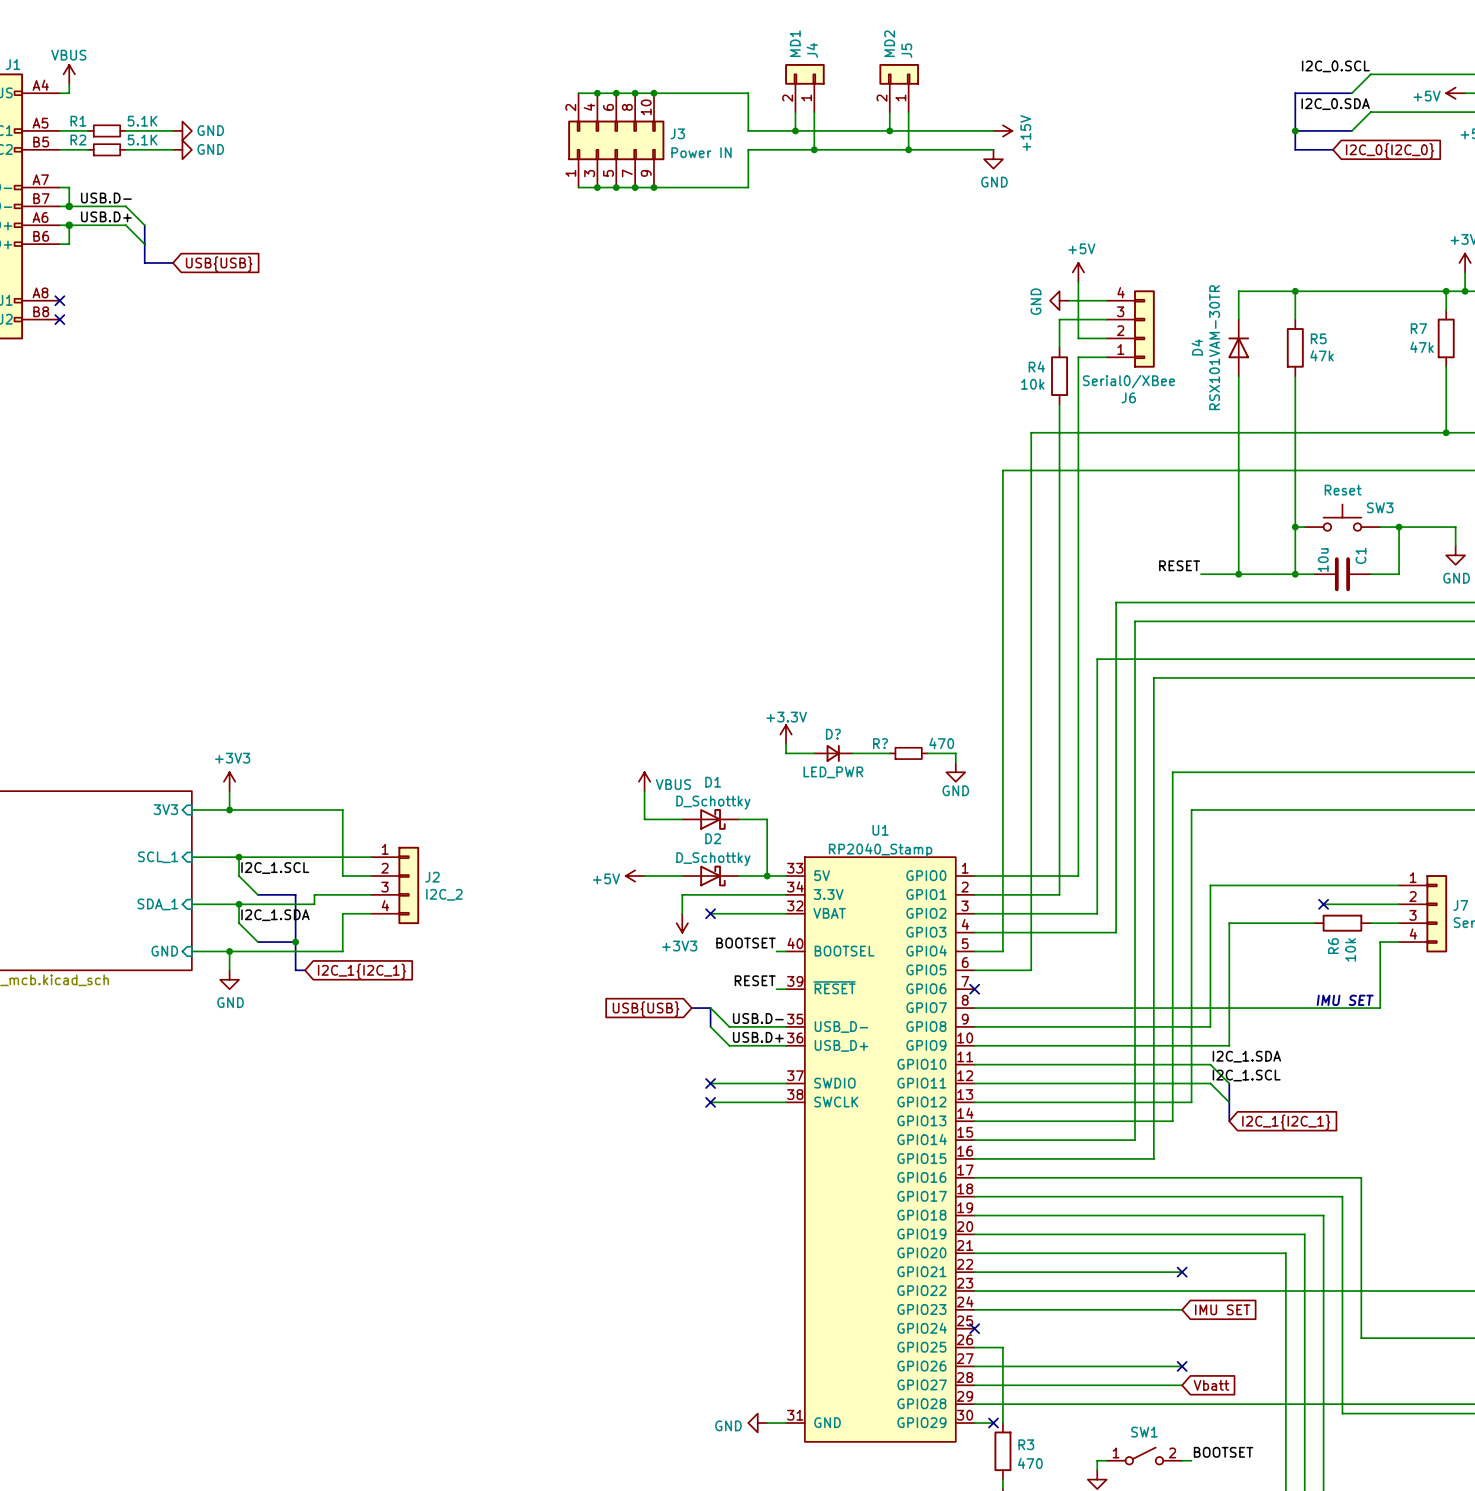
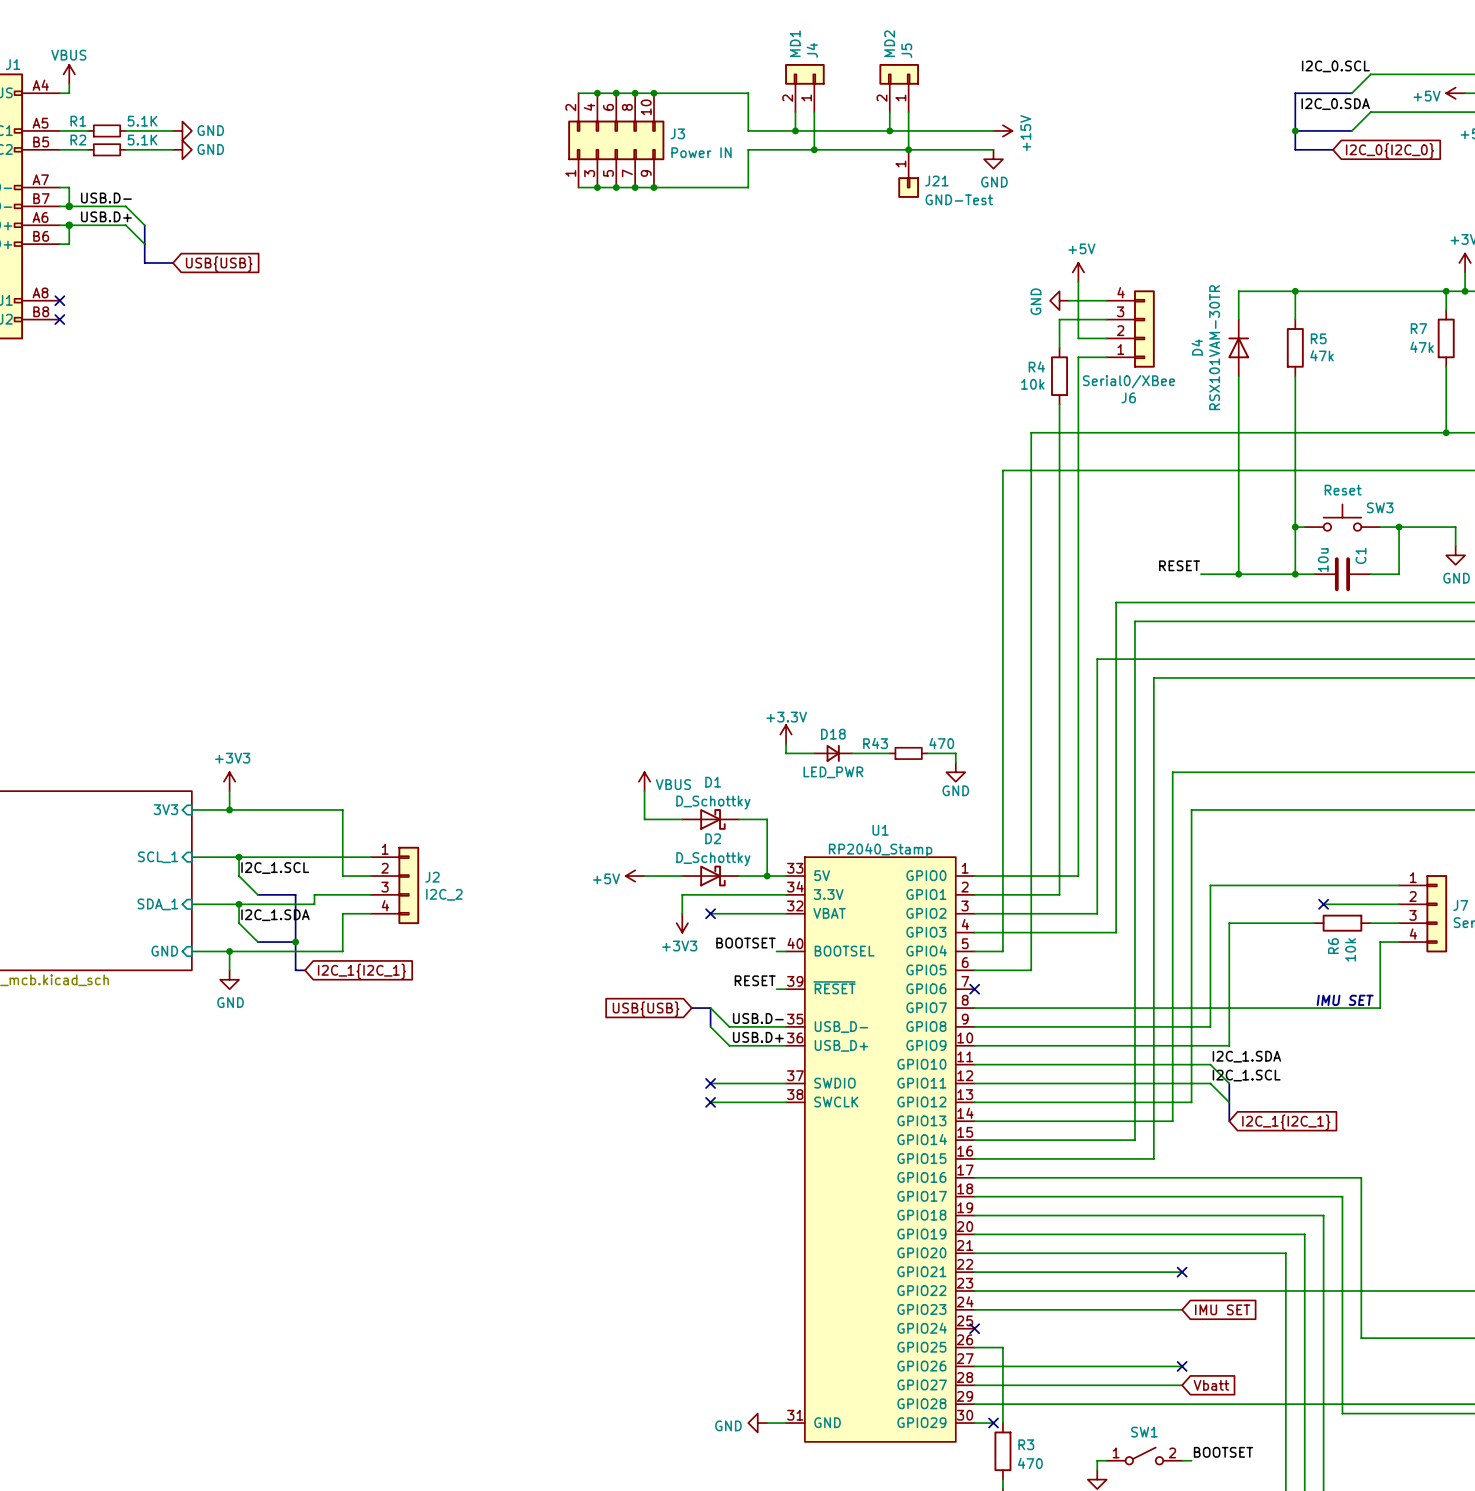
J21: none -> GND-Test (908, 173)
D? name: D? (833, 734) -> D18 (833, 734)
R? name: R? (880, 743) -> R43 (875, 743)

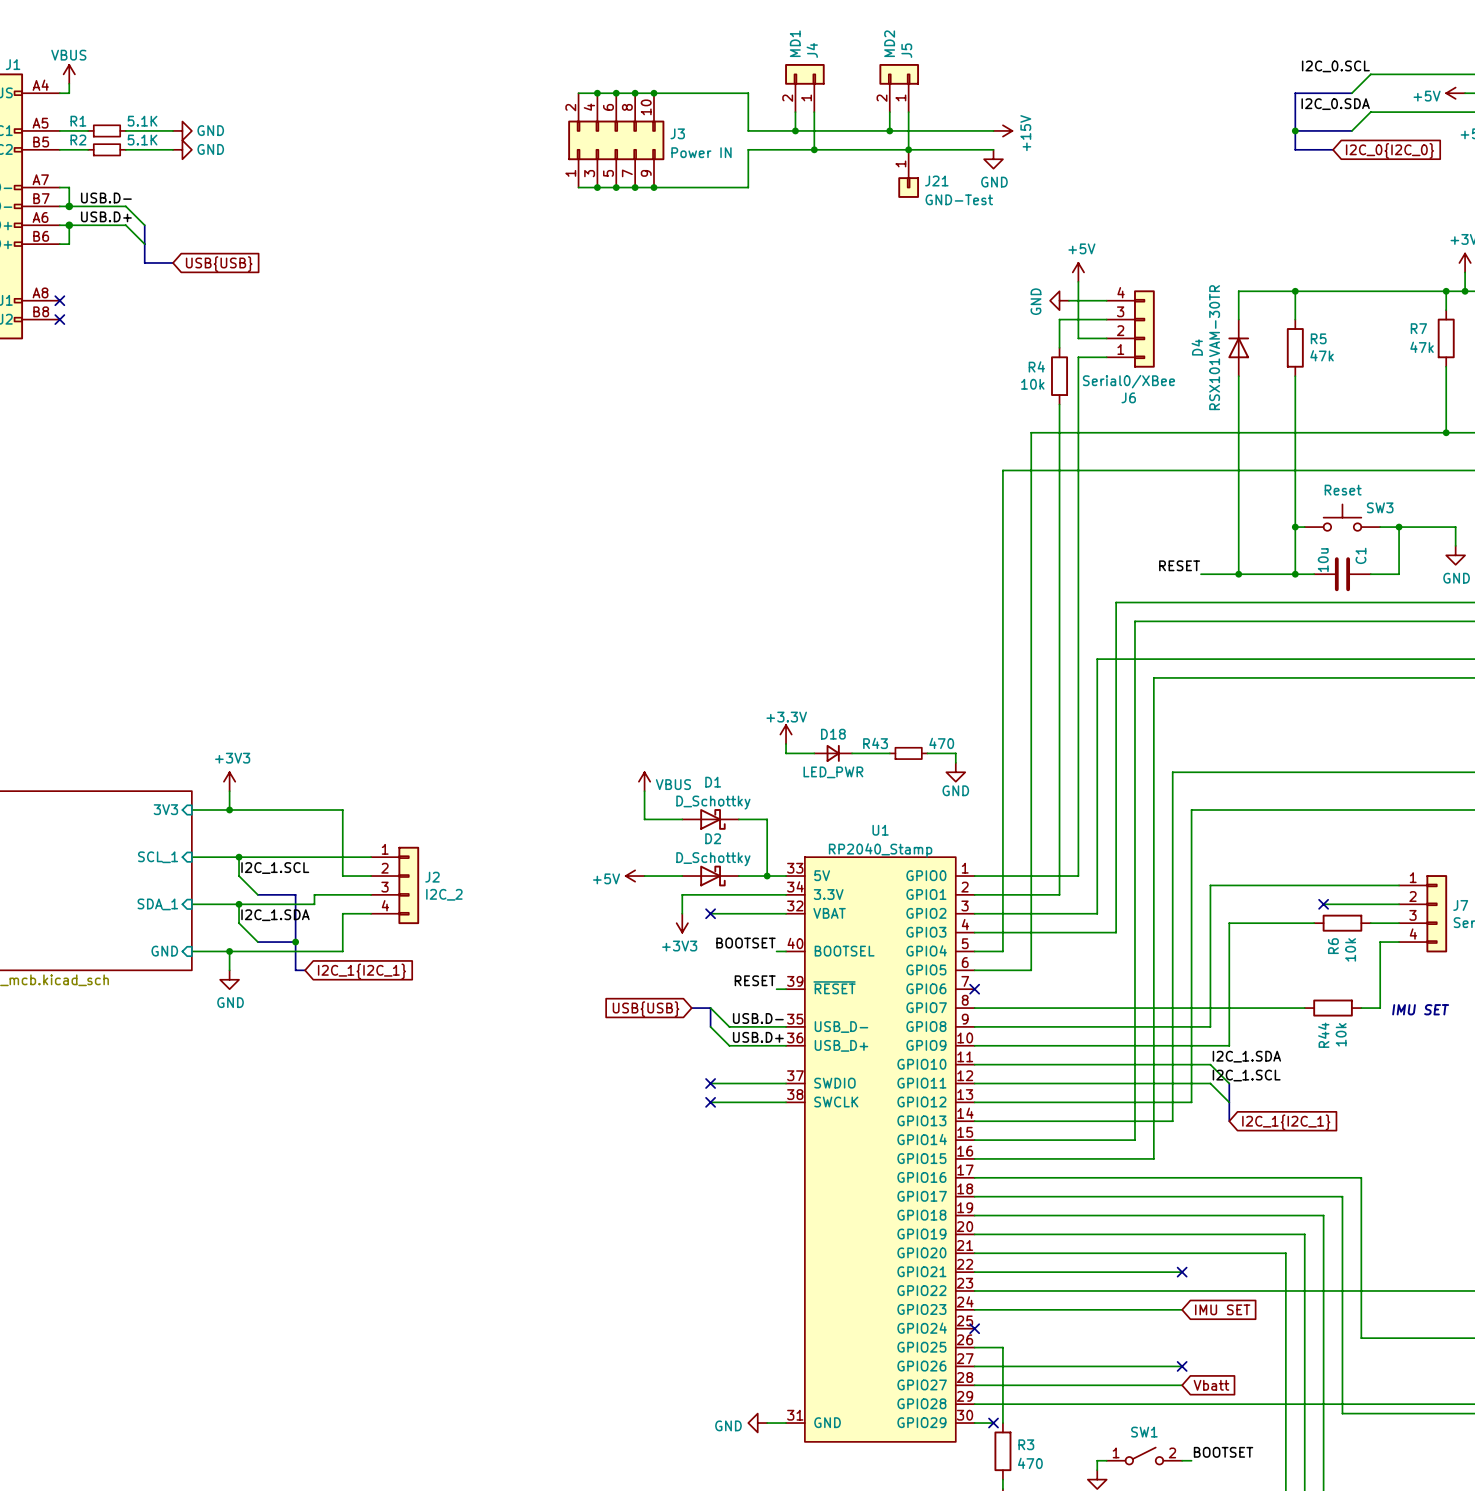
text position: IMU SET (1345, 1000) -> IMU SET (1420, 1009)
wire: (1304, 1008) (1361, 1008) -> none
R44: none -> 10k (1333, 1008)

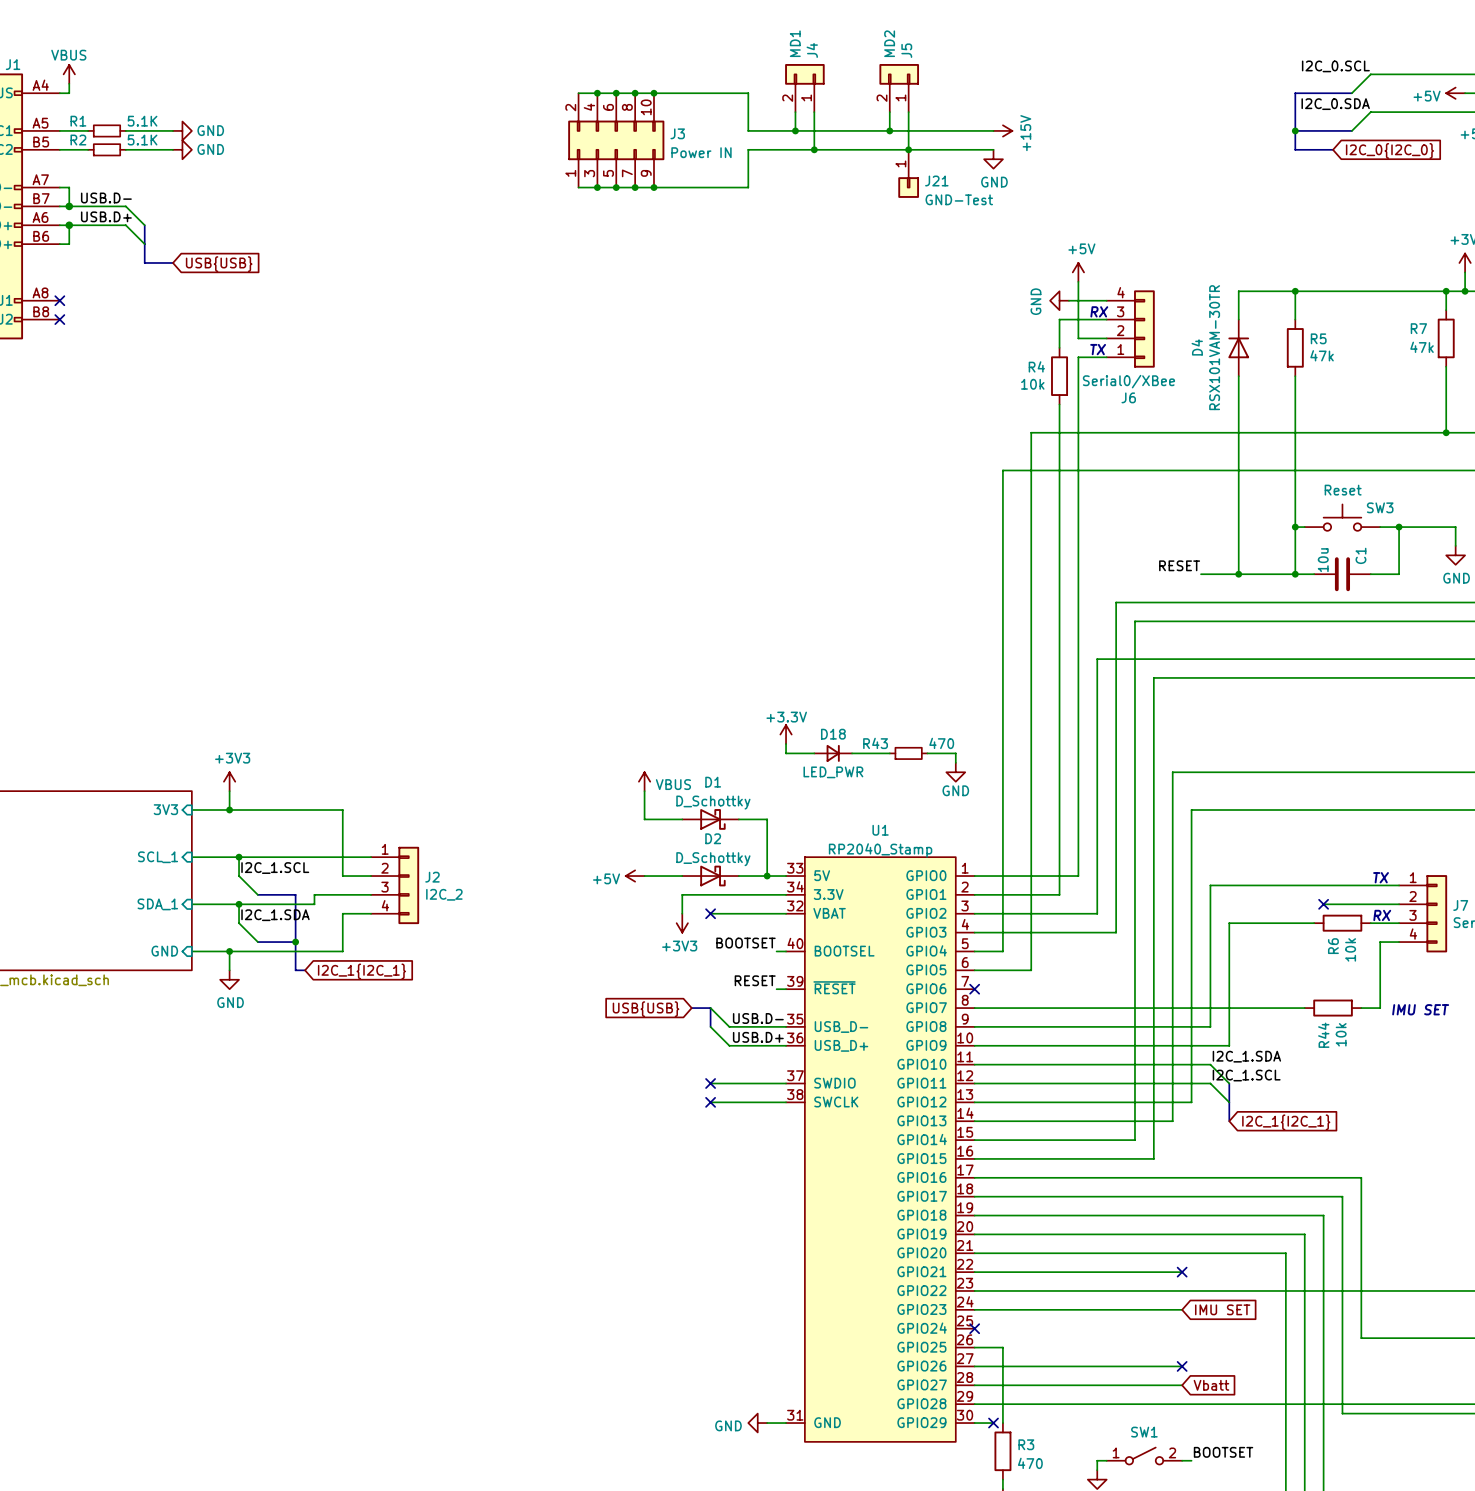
text: none -> RX (1099, 311)
text: none -> TX (1098, 349)
text: none -> TX (1381, 877)
text: none -> RX (1382, 915)

